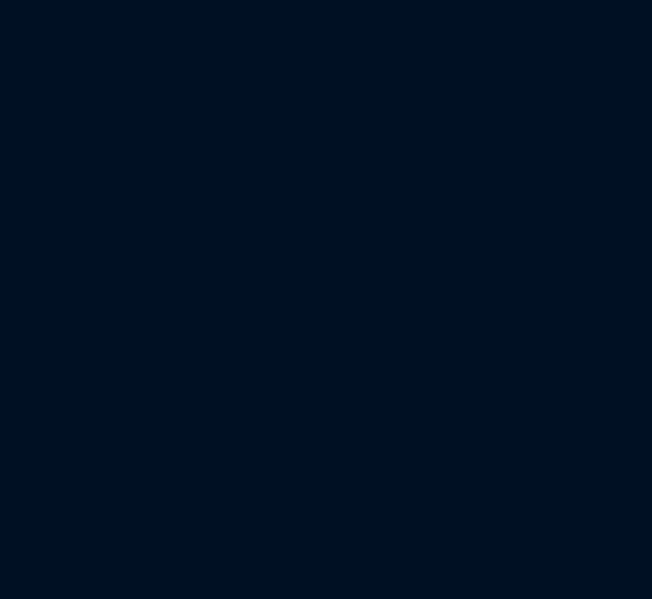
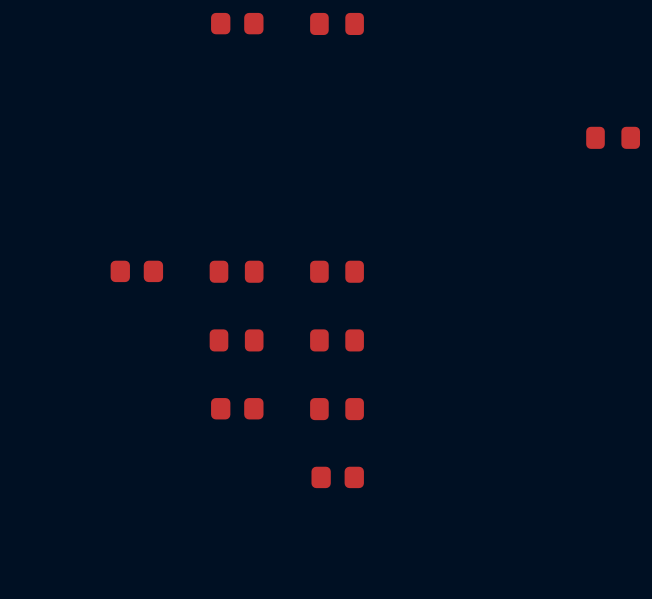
part: none -> (237, 23)
part: none -> (337, 23)
part: none -> (613, 137)
part: none -> (136, 271)
part: none -> (236, 271)
part: none -> (337, 271)
part: none -> (236, 340)
part: none -> (337, 340)
part: none -> (237, 408)
part: none -> (337, 409)
part: none -> (337, 477)

